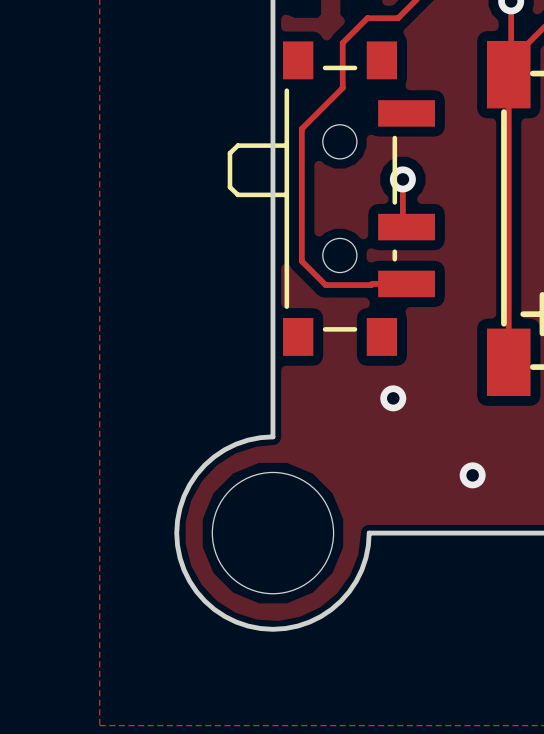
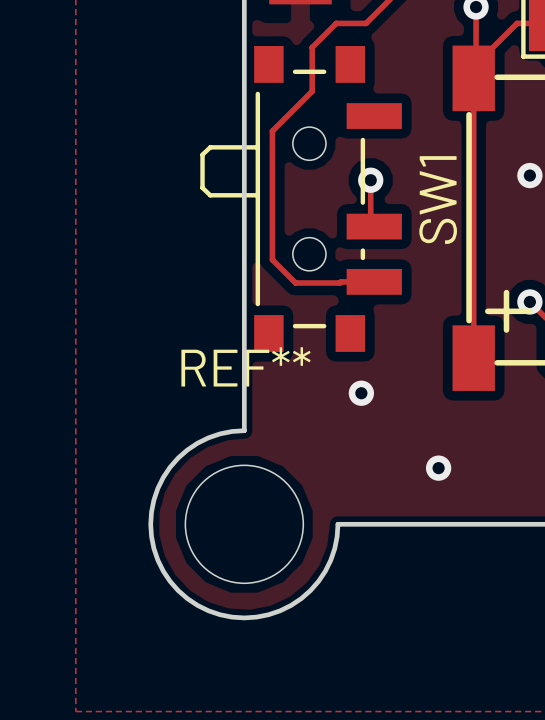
SW1 name: none -> SW1 (438, 200)
REF** name: none -> REF** (245, 366)

